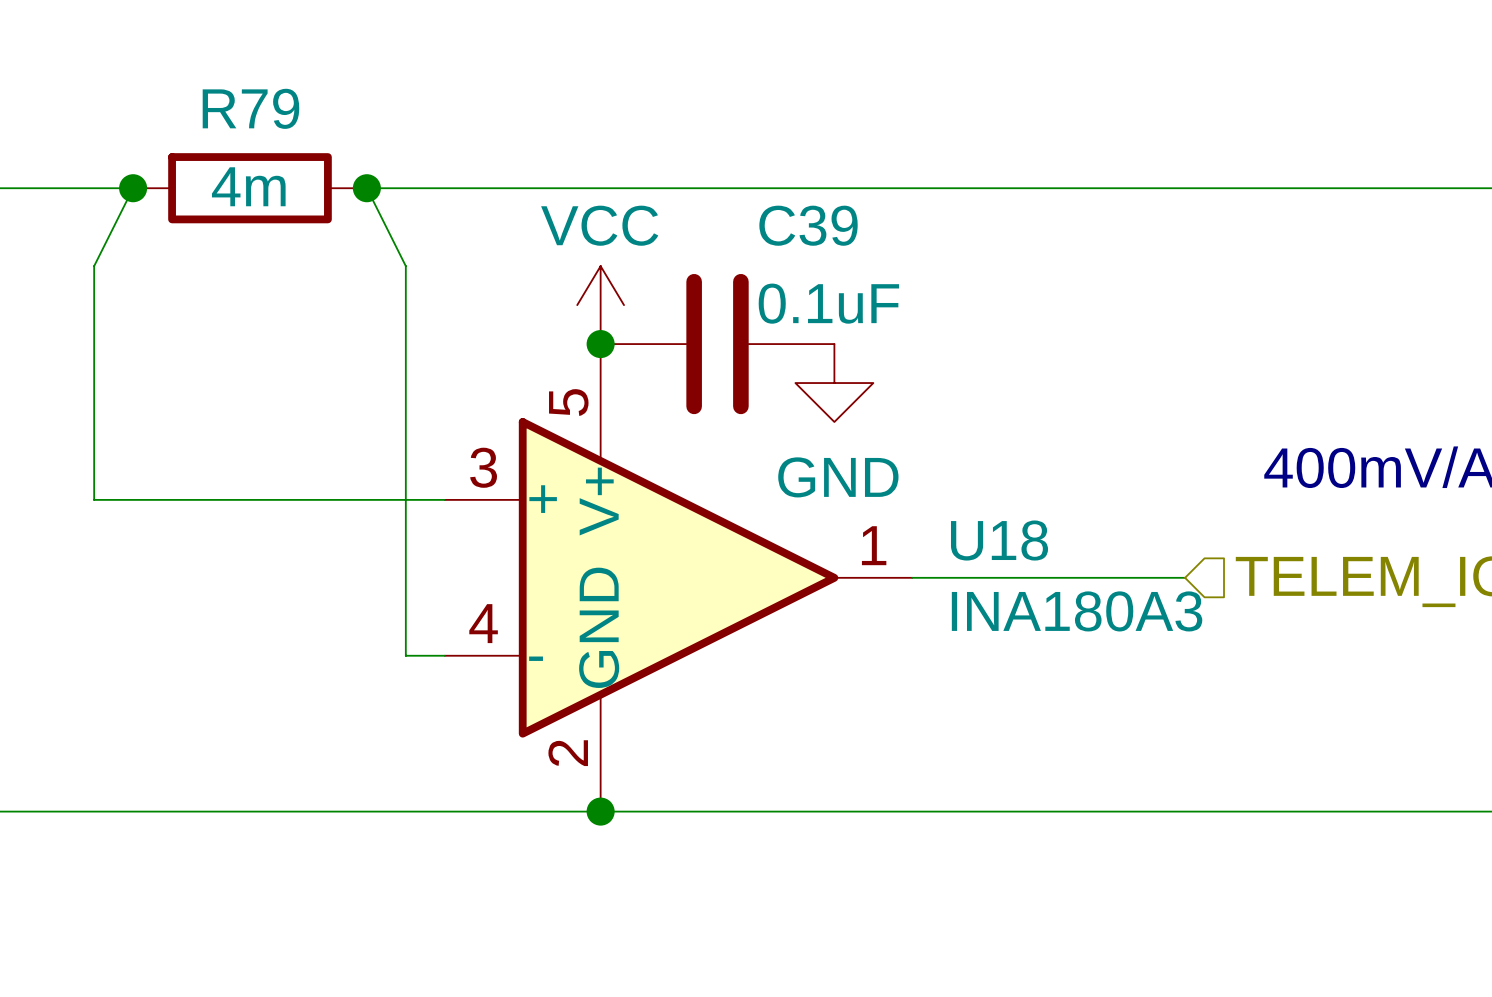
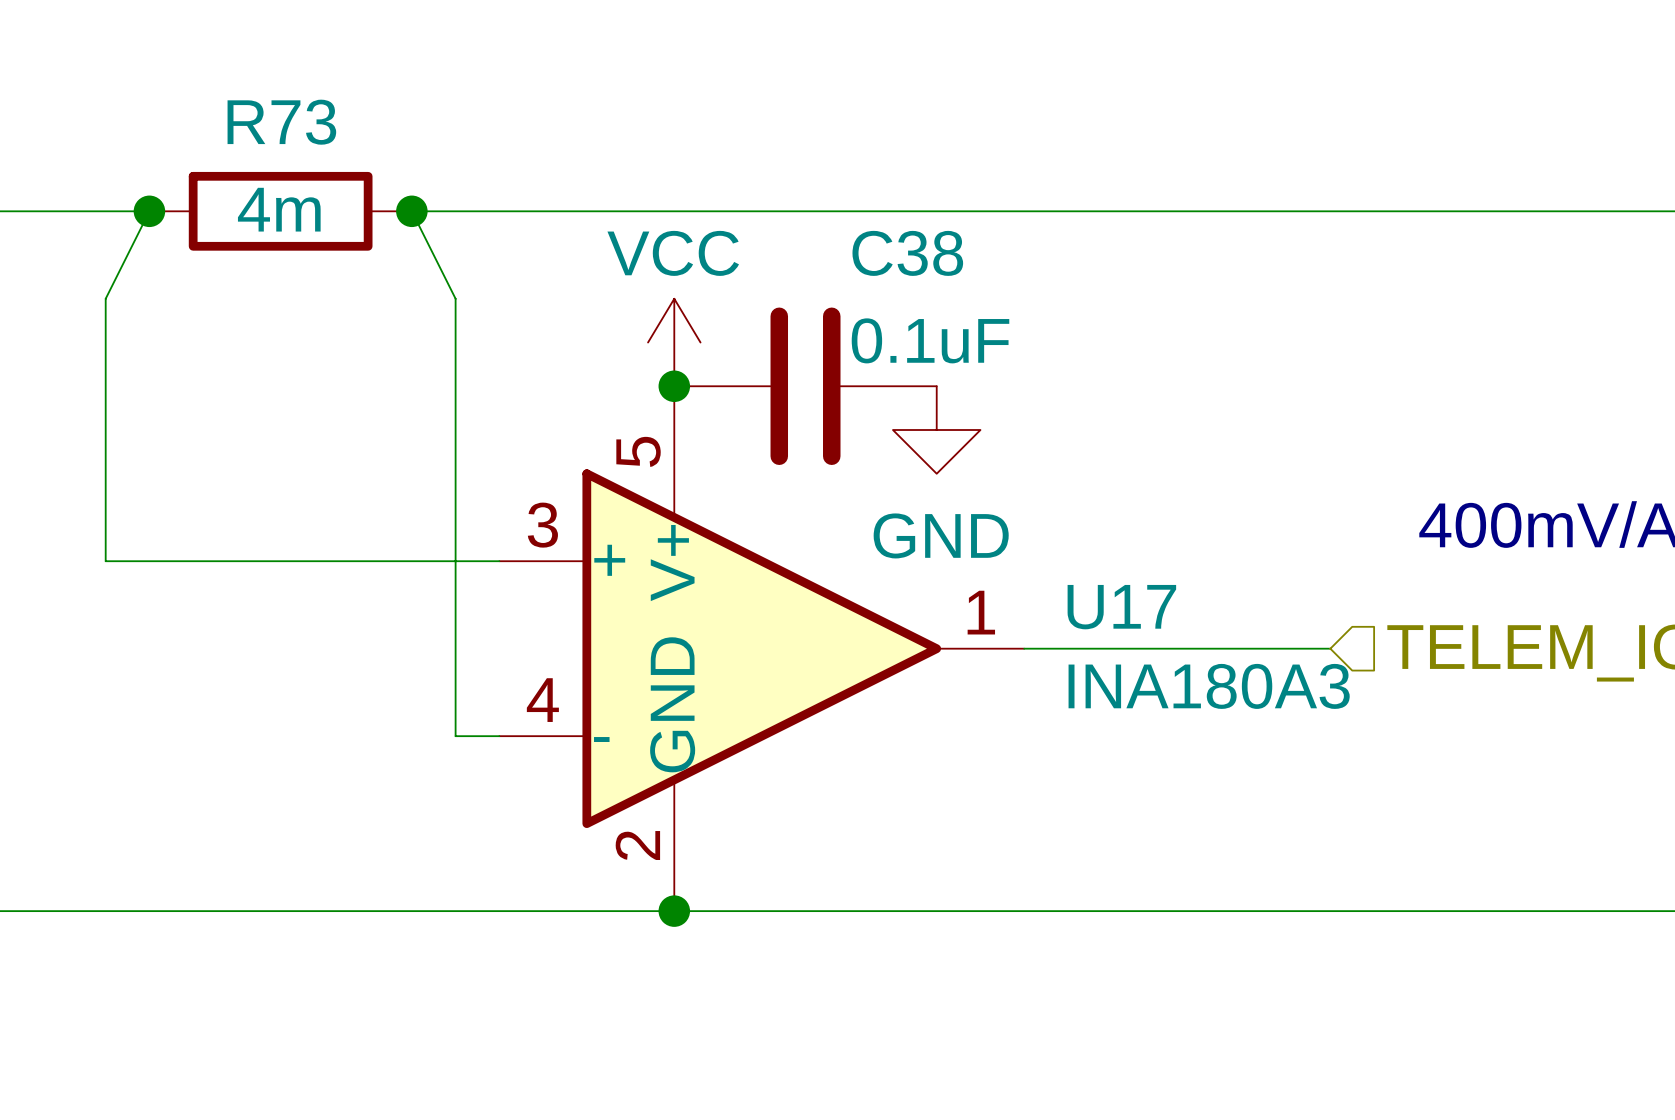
R79 name: R79 (250, 108) -> R73 (281, 122)
C39 name: C39 (808, 225) -> C38 (907, 253)
U18 name: U18 (999, 540) -> U17 (1121, 607)

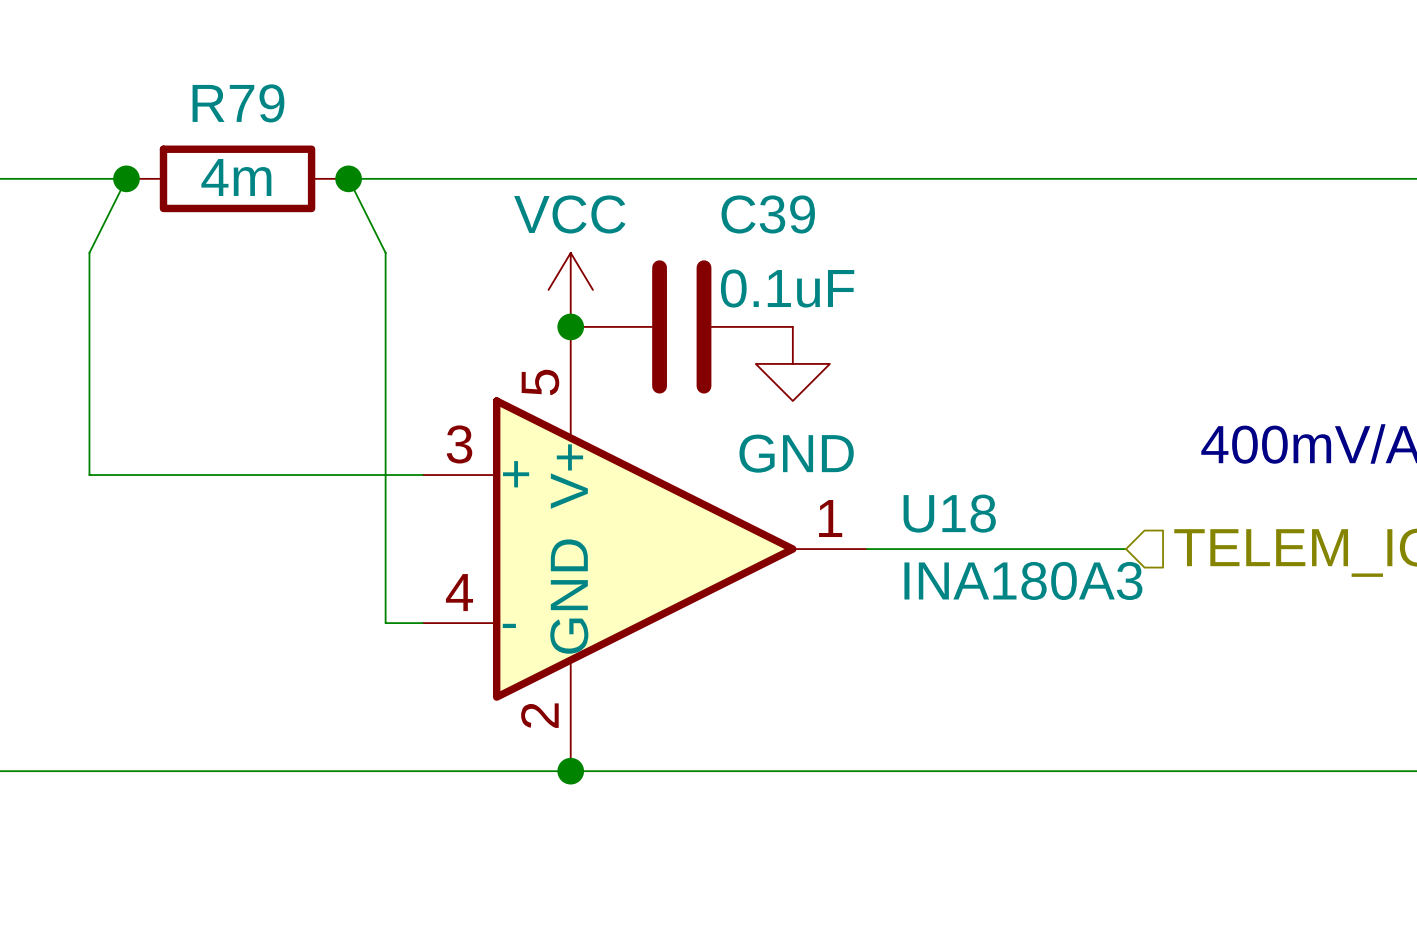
R73 name: R73 (281, 122) -> R79 (238, 103)
C38 name: C38 (907, 253) -> C39 (768, 214)
U17 name: U17 (1121, 607) -> U18 (949, 513)

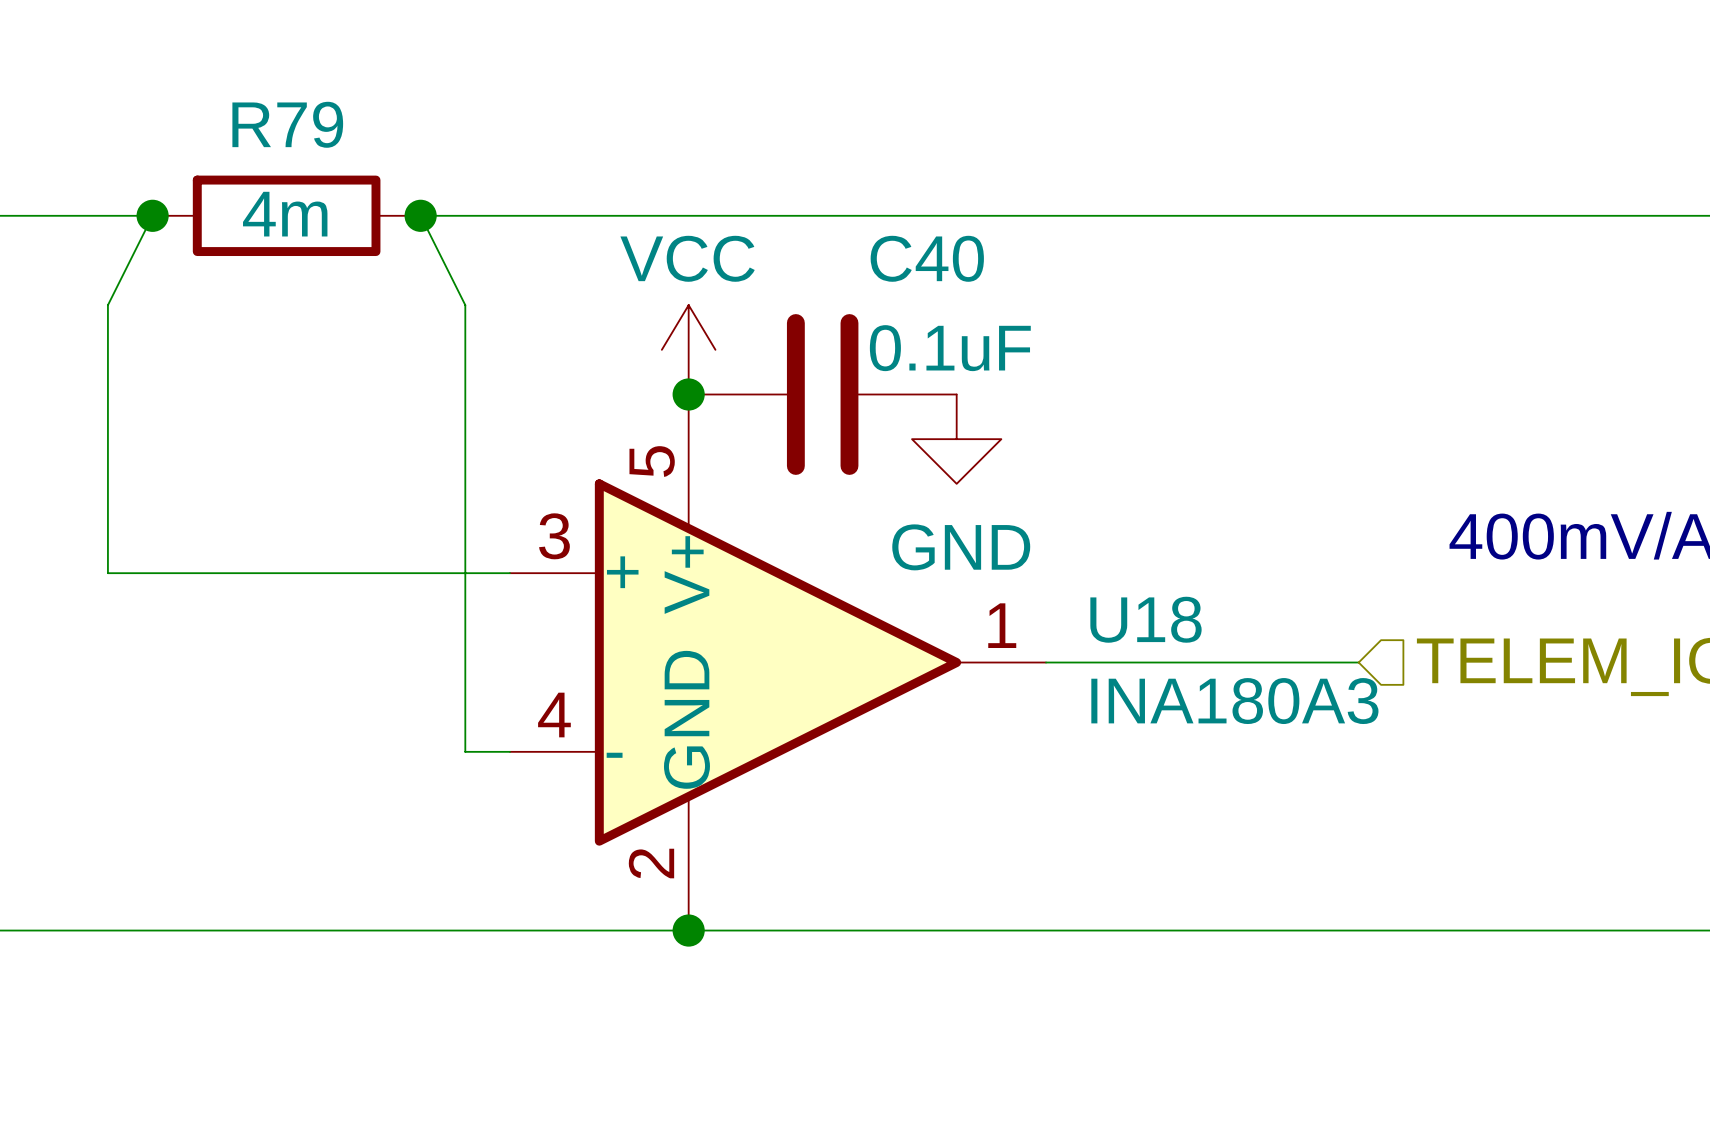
C39 name: C39 (768, 214) -> C40 (927, 258)

